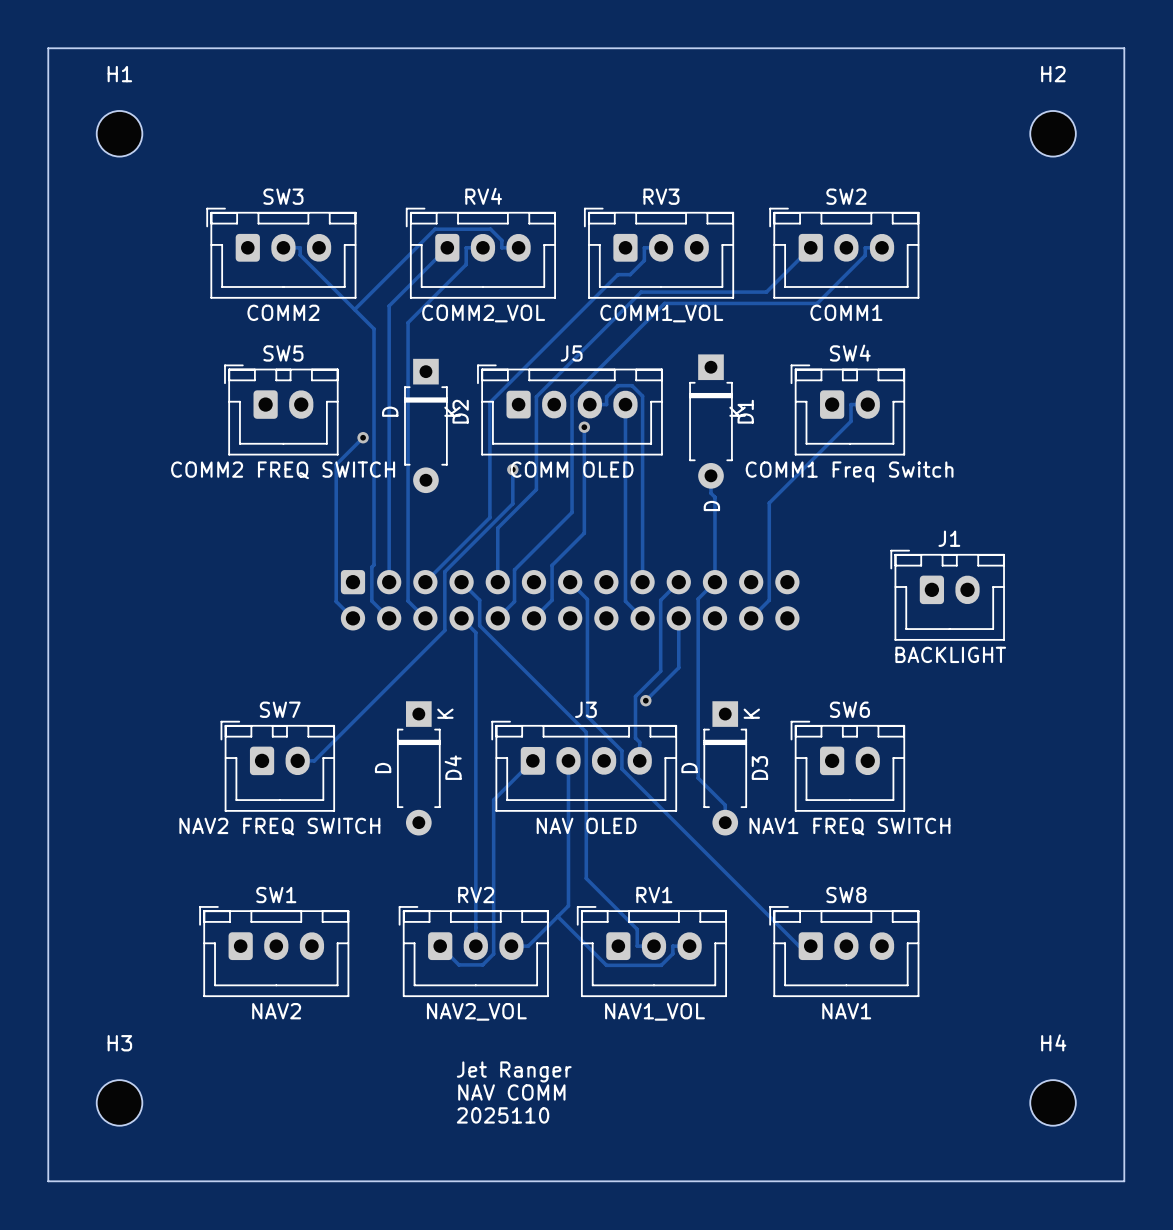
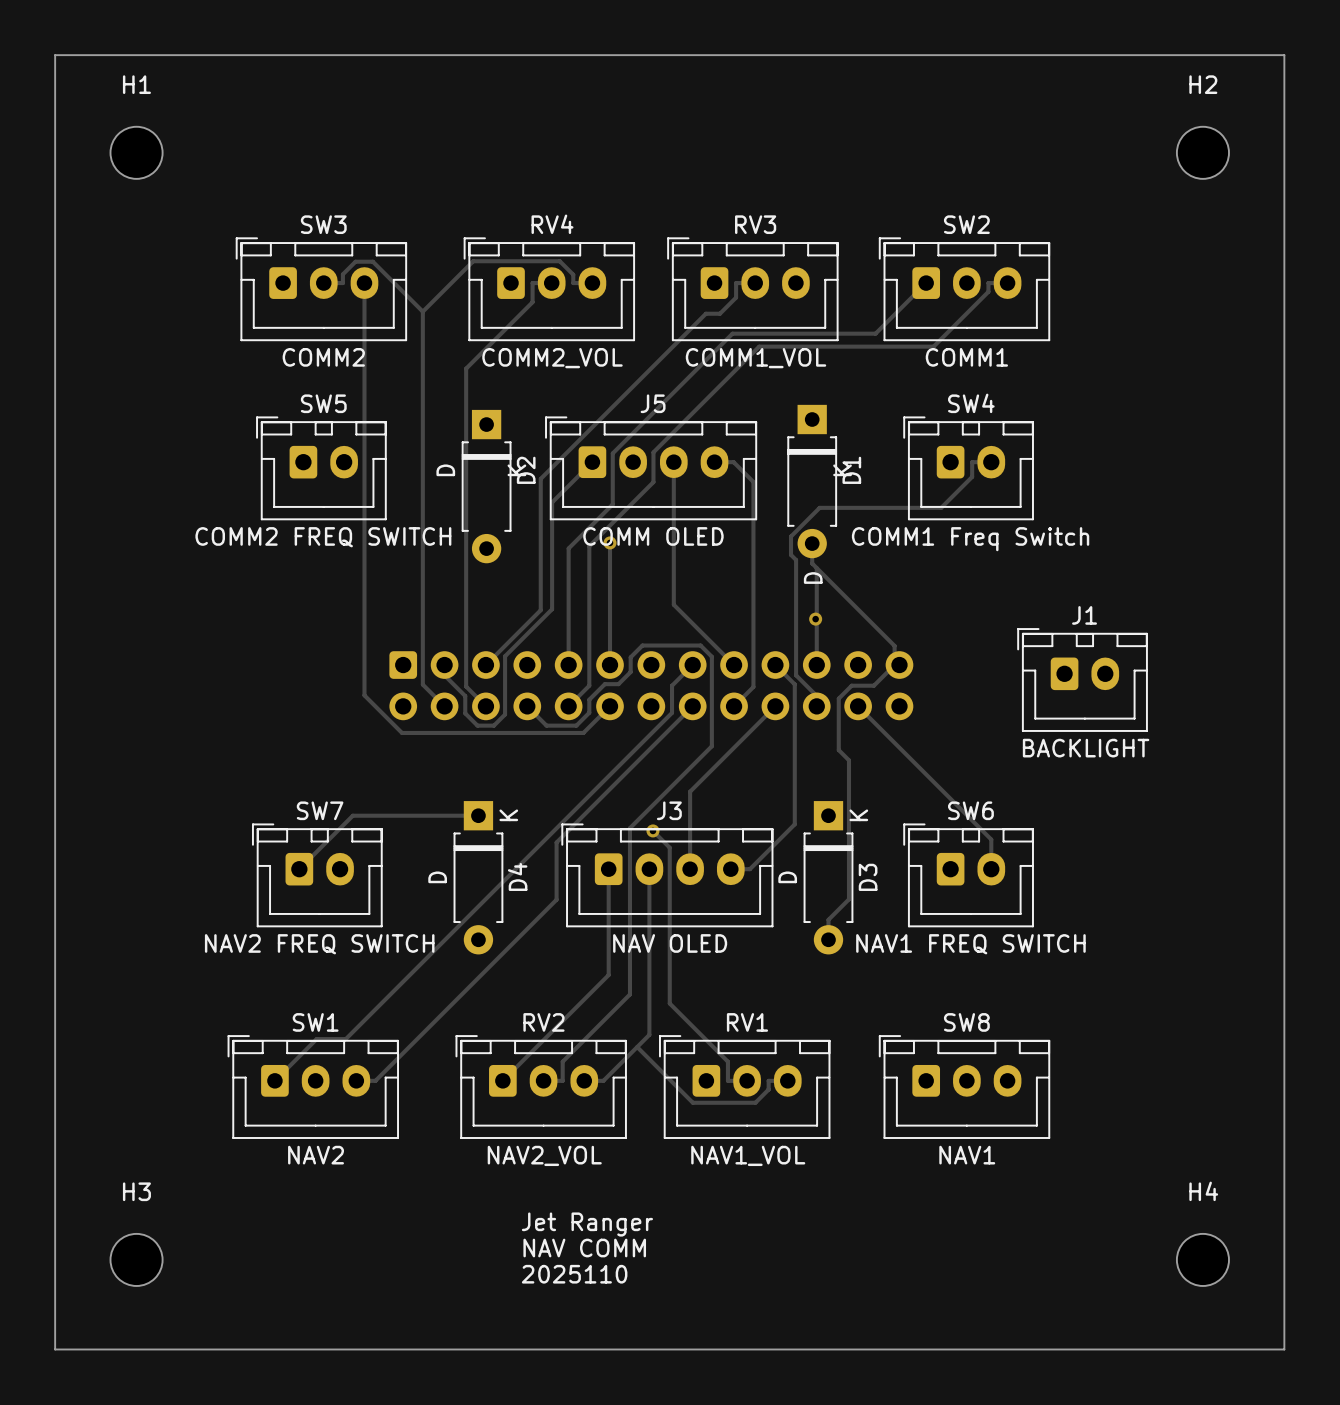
track: (490, 229) (435, 229) (354, 309) -> (560, 261) (473, 261) (422, 311)
track: (300, 247) (300, 255) (374, 328) (374, 564) (371, 567) (371, 601) -> (422, 311) (422, 684) (424, 686)
track: none -> (342, 283) (342, 274) (355, 261) (372, 261) (422, 311)
track: none -> (364, 283) (364, 695) (402, 732) (583, 732) (610, 706)
track: (447, 247) (389, 305) (389, 582) -> none
track: (489, 402) (489, 517) (473, 534) -> (559, 459) (540, 478) (540, 610)
track: (589, 404) (606, 404) (606, 396) (617, 385) (632, 385) (642, 396) (642, 582) -> (673, 462) (673, 604) (734, 665)
track: (625, 404) (625, 601) (642, 618) -> (714, 462) (733, 462) (753, 481) (753, 687) (734, 706)
track: (851, 417) (851, 421) (769, 503) (769, 600) (751, 618) -> (972, 476) (941, 507) (819, 507) (791, 536) (791, 554) (796, 560) (796, 675) (816, 696) (816, 706)
track: (572, 422) (572, 512) (514, 569) (514, 601) -> (653, 482) (589, 546) (589, 685) (587, 687)
track: (584, 427) (584, 533) (552, 565) (552, 575) -> none
via: (584, 427) -> none
track: (363, 437) (336, 464) (336, 601) (352, 618) -> none
via: (363, 437) -> none
track: (536, 441) (536, 489) (497, 528) -> (612, 504) (568, 548) (568, 603)
track: (512, 469) (512, 503) (483, 533) -> (592, 462) (552, 502) (552, 609)
via position: (512, 469) -> (610, 542)
track: none -> (610, 542) (610, 665)
track: none -> (816, 568) (894, 645) (894, 665)
via: none -> (815, 619)
track: (444, 571) (444, 630) (314, 760) (297, 760) -> (508, 653) (505, 656) (505, 714) (493, 725) (477, 725) (465, 713) (465, 696) (444, 675) (444, 665)
track: (461, 582) (479, 600) (479, 625) (586, 732) (586, 742) -> (652, 830) (669, 847)
track: (570, 582) (587, 599) (587, 716) (621, 750) (621, 768) (799, 946) (810, 946) -> none
track: none -> (692, 665) (672, 685) (672, 712) (345, 1039) (316, 1039) (274, 1080)
track: (678, 582) (660, 600) (660, 671) (635, 696) (635, 738) (639, 742) (639, 760) -> (775, 665) (794, 684) (794, 824) (749, 869) (730, 869)
track: (714, 582) (698, 598) (698, 778) (725, 805) -> (894, 665) (873, 685) (851, 685) (838, 698) (838, 750) (848, 760) (848, 899) (828, 919)
track: (552, 588) (552, 600) (533, 618) -> (630, 672) (618, 684) (604, 684) (589, 699) (589, 712) (576, 725) (546, 725) (543, 722)
track: none -> (692, 706) (556, 842) (556, 899) (375, 1080) (356, 1080)
track: (678, 618) (678, 667) (645, 700) -> (775, 706) (690, 791) (690, 869)
track: none -> (858, 706) (991, 839) (991, 869)
track: (475, 632) (475, 946) -> (630, 657) (642, 645) (700, 645) (711, 656) (711, 746) (629, 828) (629, 994) (562, 1061) (562, 1080) (543, 1080)
via position: (645, 700) -> (652, 830)
track: none -> (478, 815) (352, 815) (299, 869)
track: (532, 760) (493, 800) (493, 954) (482, 964) (458, 964) (440, 946) -> (608, 869) (608, 975) (502, 1080)

